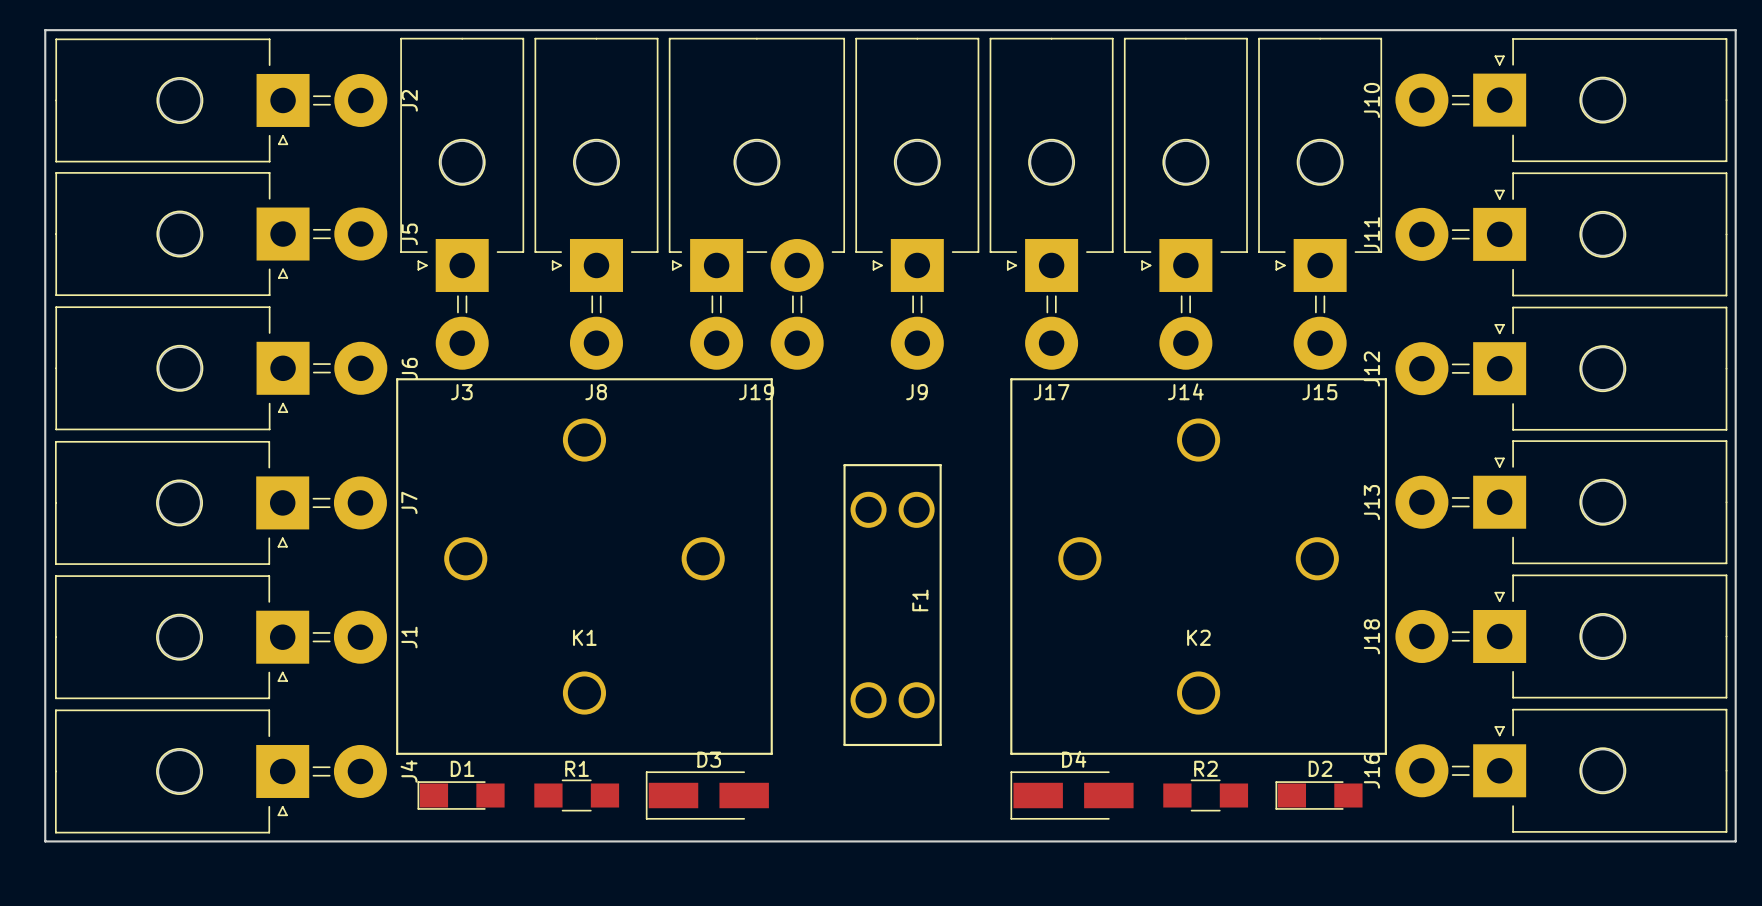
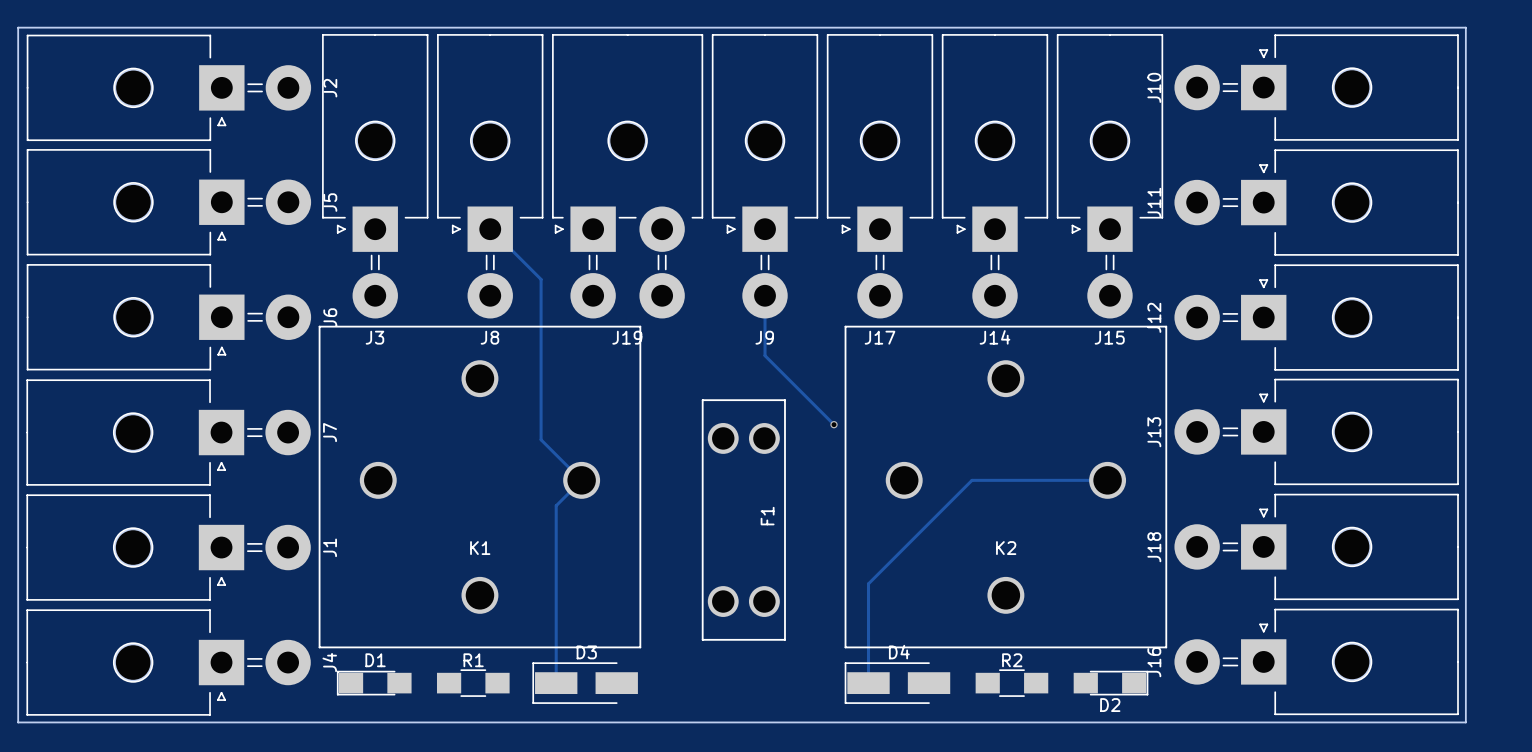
track: none -> (490, 229) (541, 279) (541, 439) (581, 480) (556, 505) (556, 683)
track: none -> (765, 295) (765, 355) (834, 424)
via: none -> (834, 424)
track: none -> (1107, 480) (972, 480) (868, 583) (868, 683)
D2 rotation: 0° (1319, 795) -> 180° (1110, 683)

